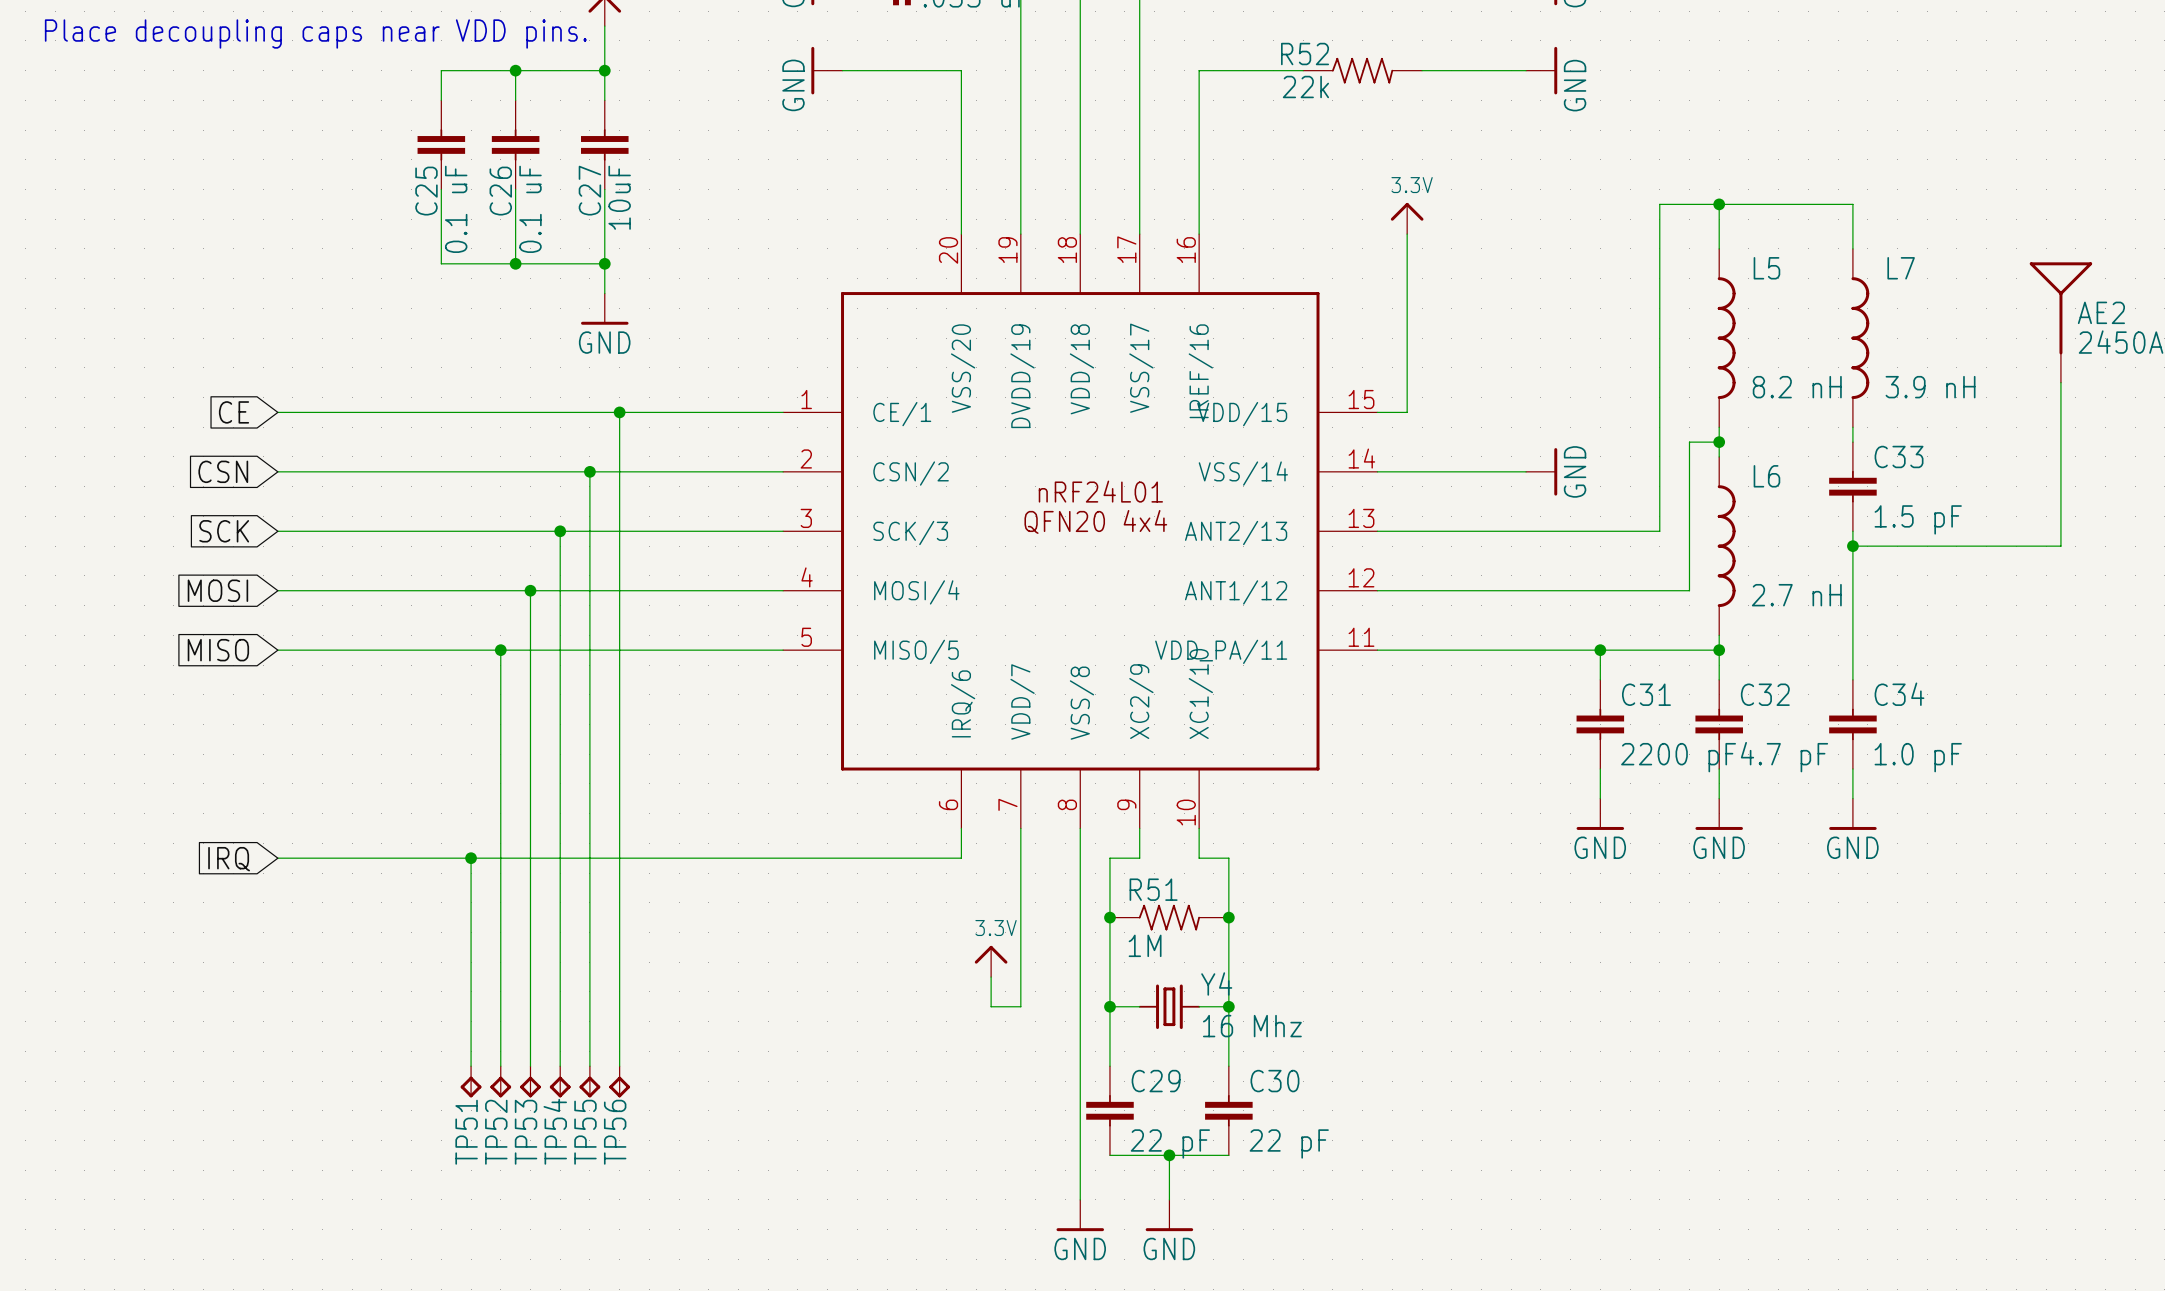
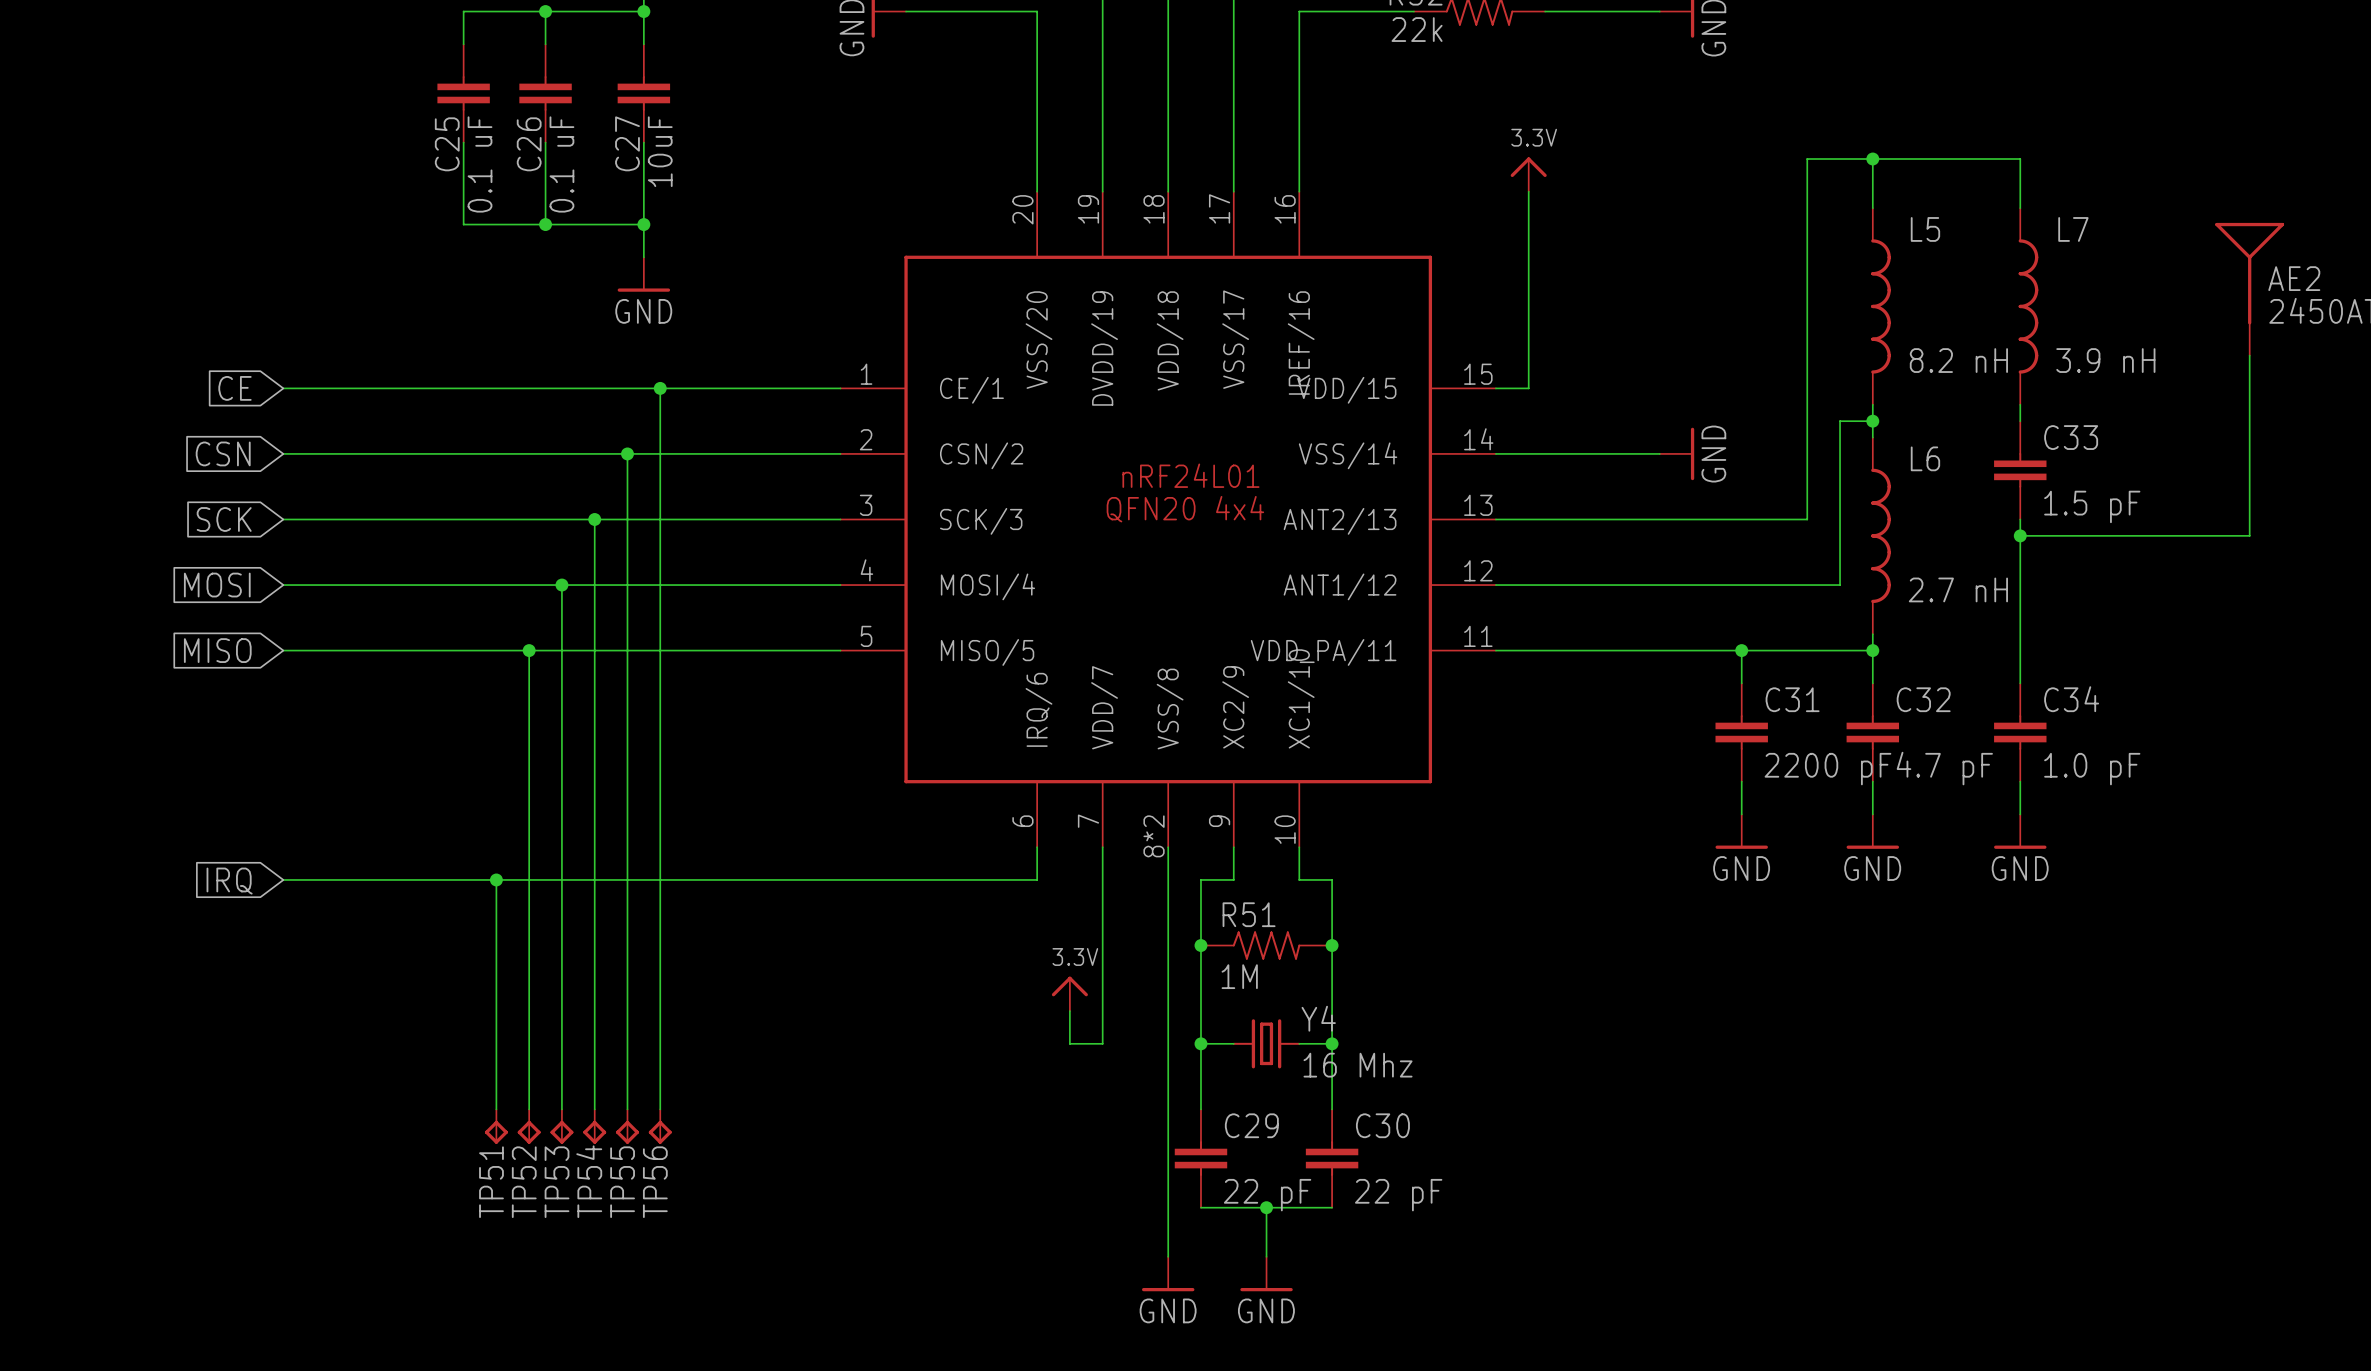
part pin number: 8 (1067, 804) -> 8*2 (1154, 836)

